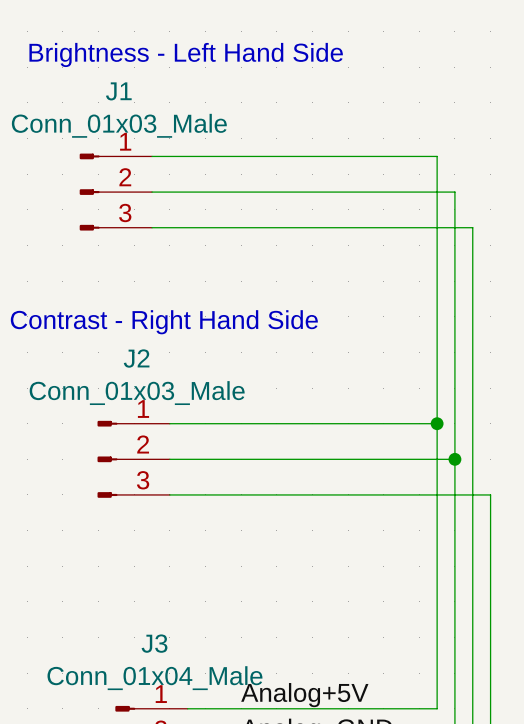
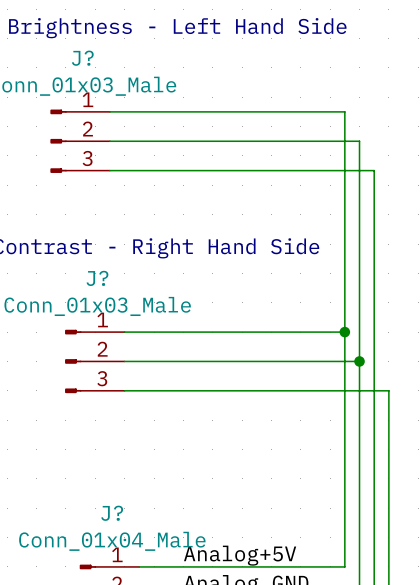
J1 name: J1 (118, 91) -> J? (82, 58)
J2 name: J2 (136, 358) -> J? (97, 278)
J3 name: J3 (154, 643) -> J? (112, 513)

